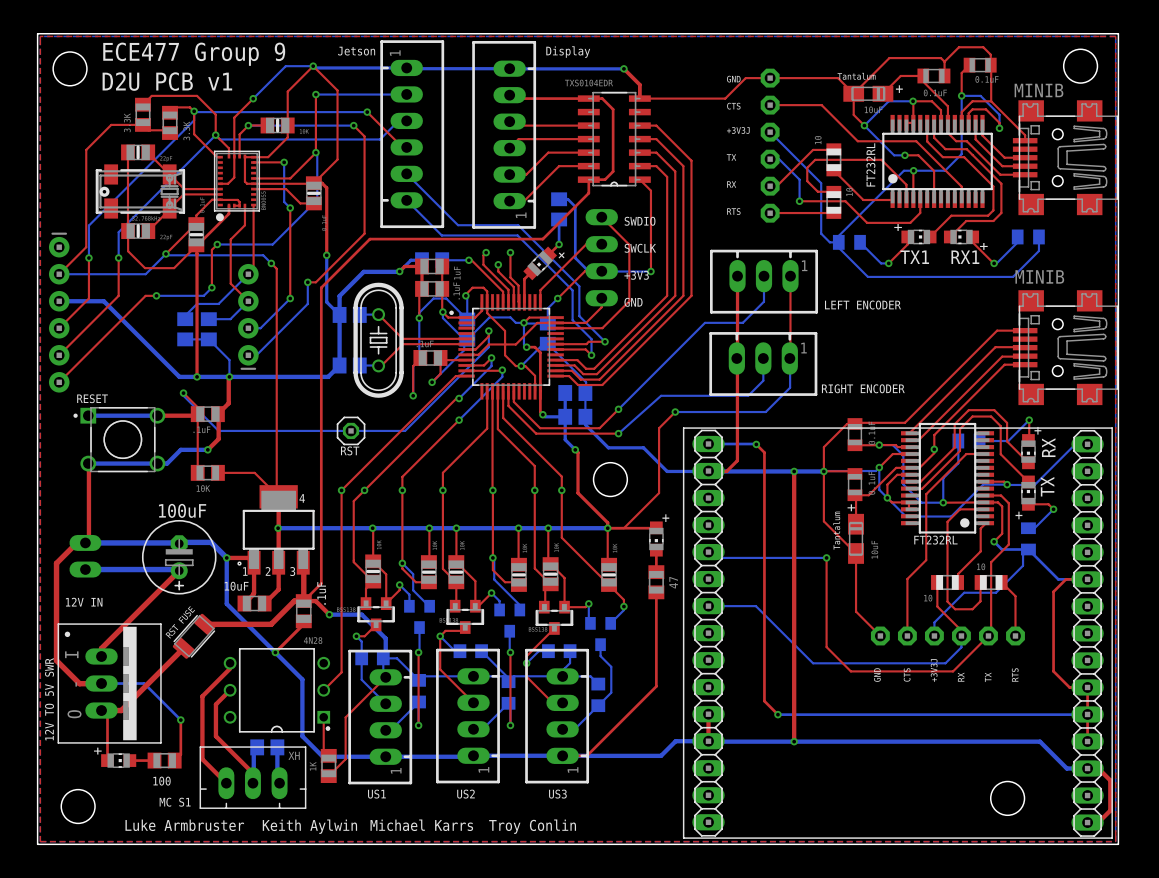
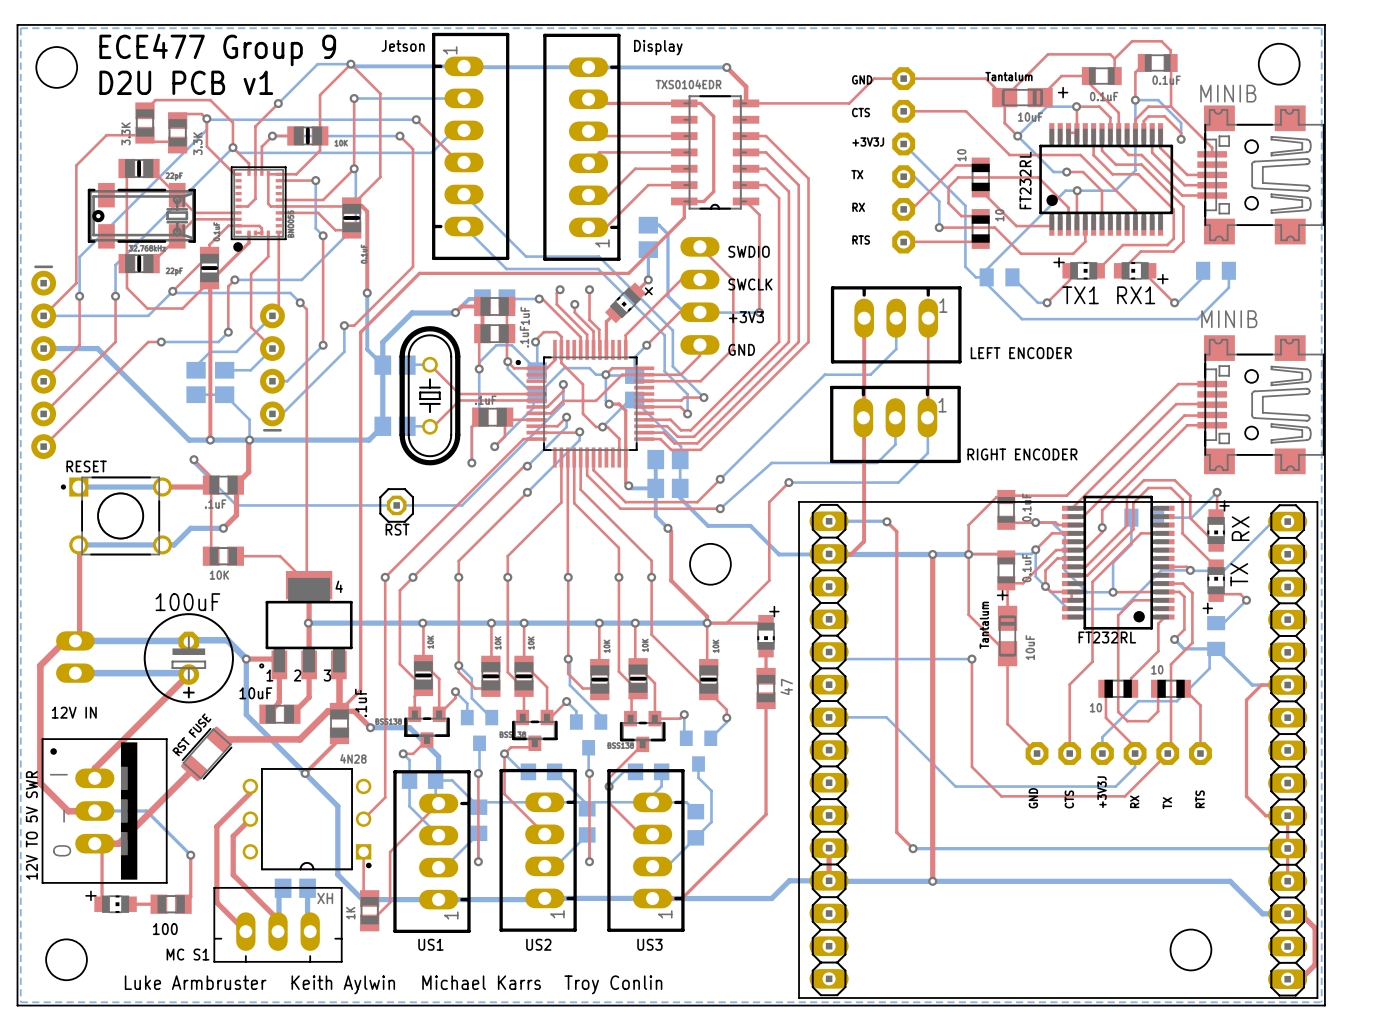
top zone outline: (40, 36) (1115, 36) (1115, 841) (40, 841) (40, 36) -> none

